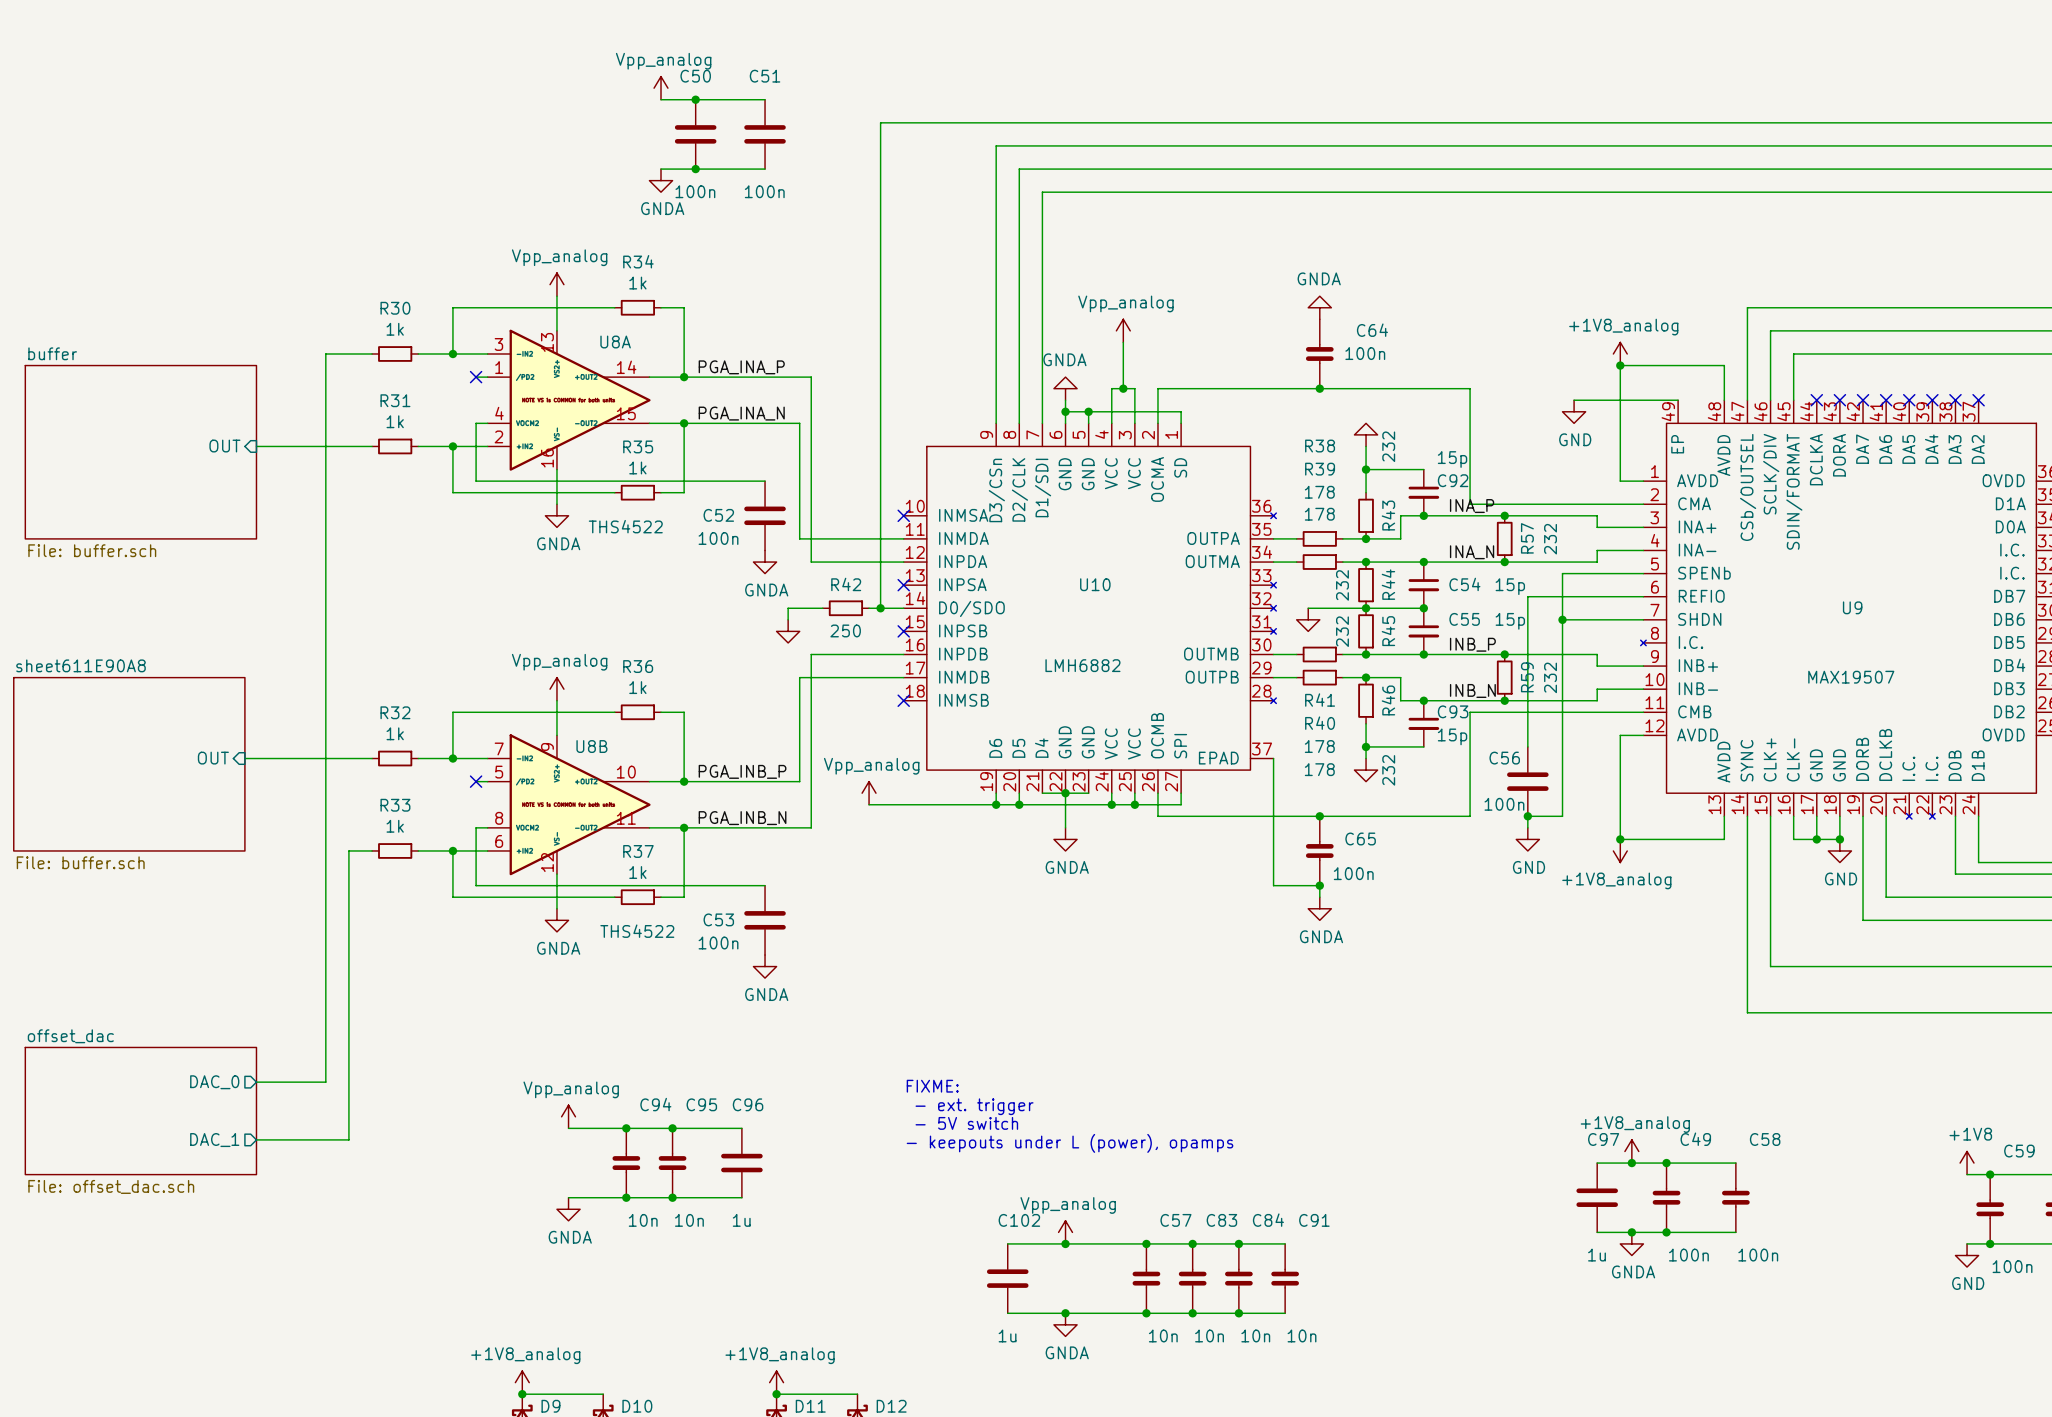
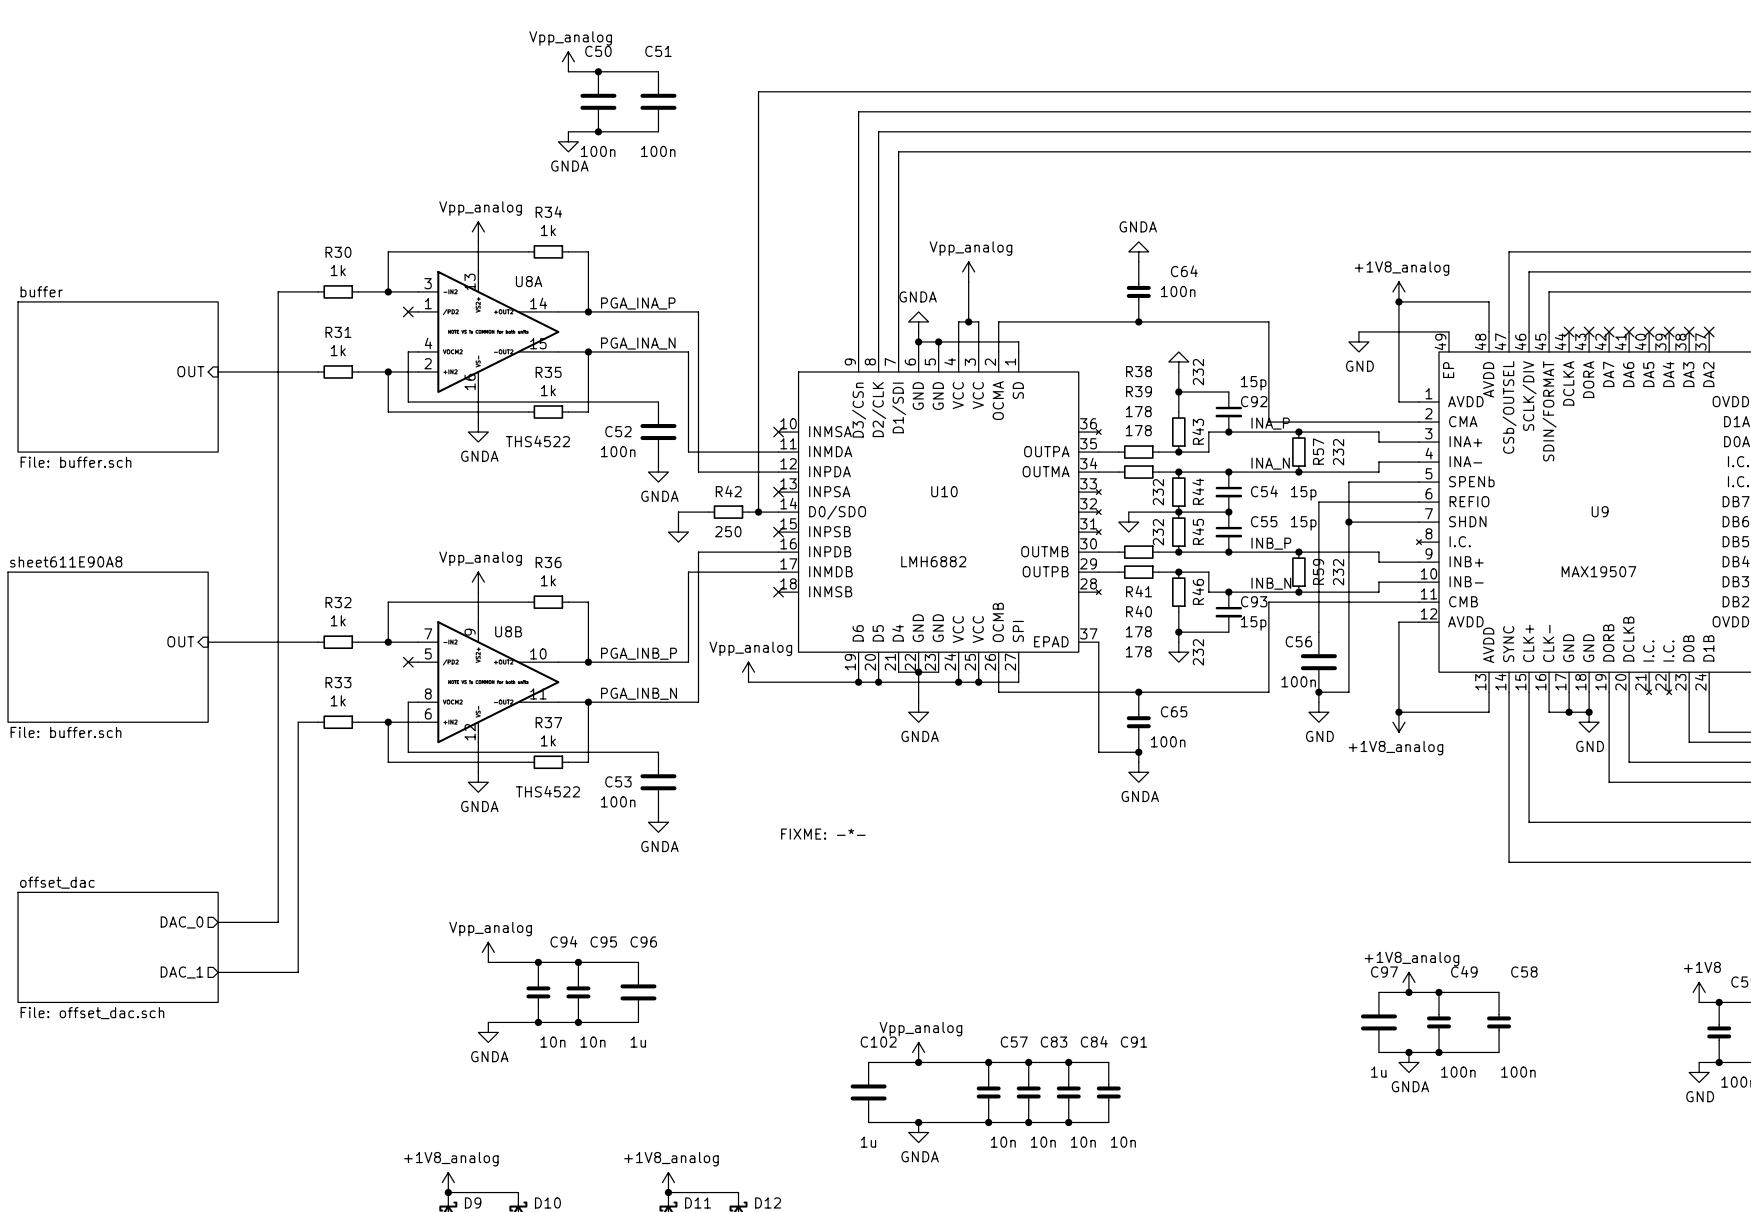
text: none -> FIXME: -*- (823, 834)
text: FIXME: (932, 1086) -> none
text: - ext. trigger (974, 1106) -> none
text: - 5V switch (966, 1123) -> none
text: - keepouts under L (power), opamps (1070, 1143) -> none

